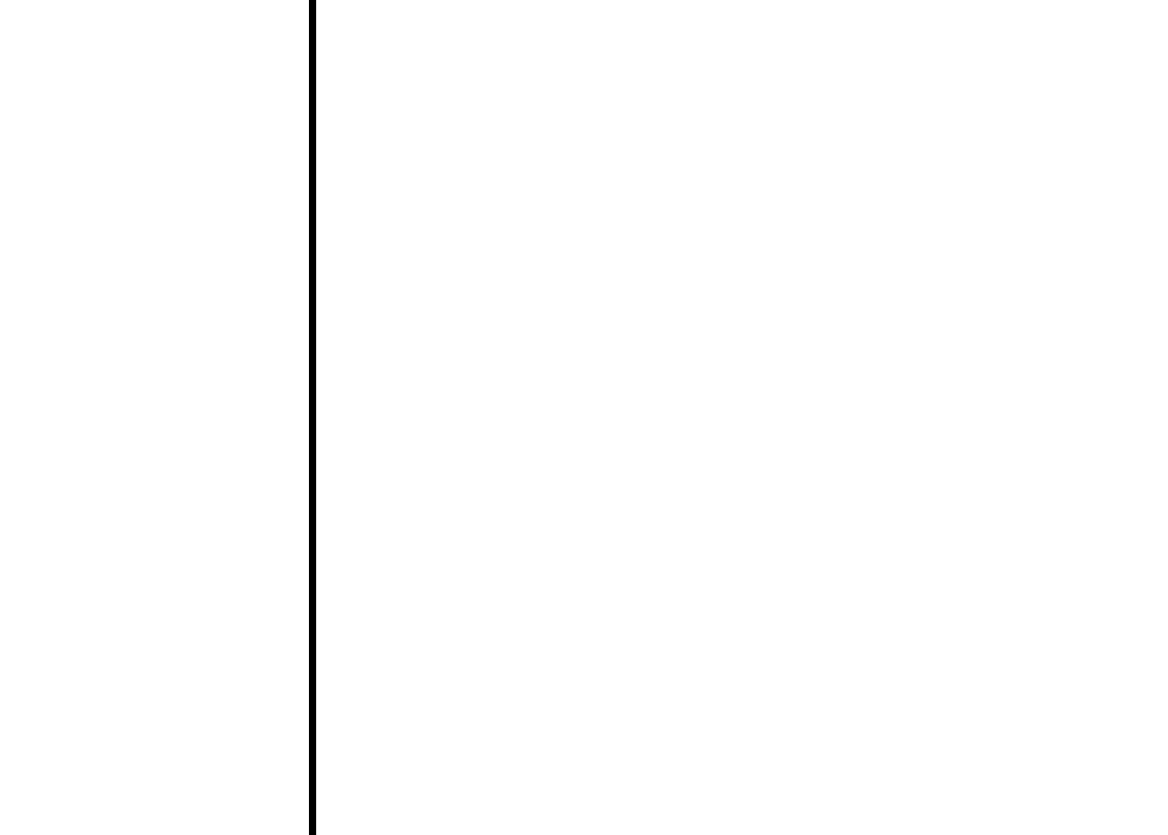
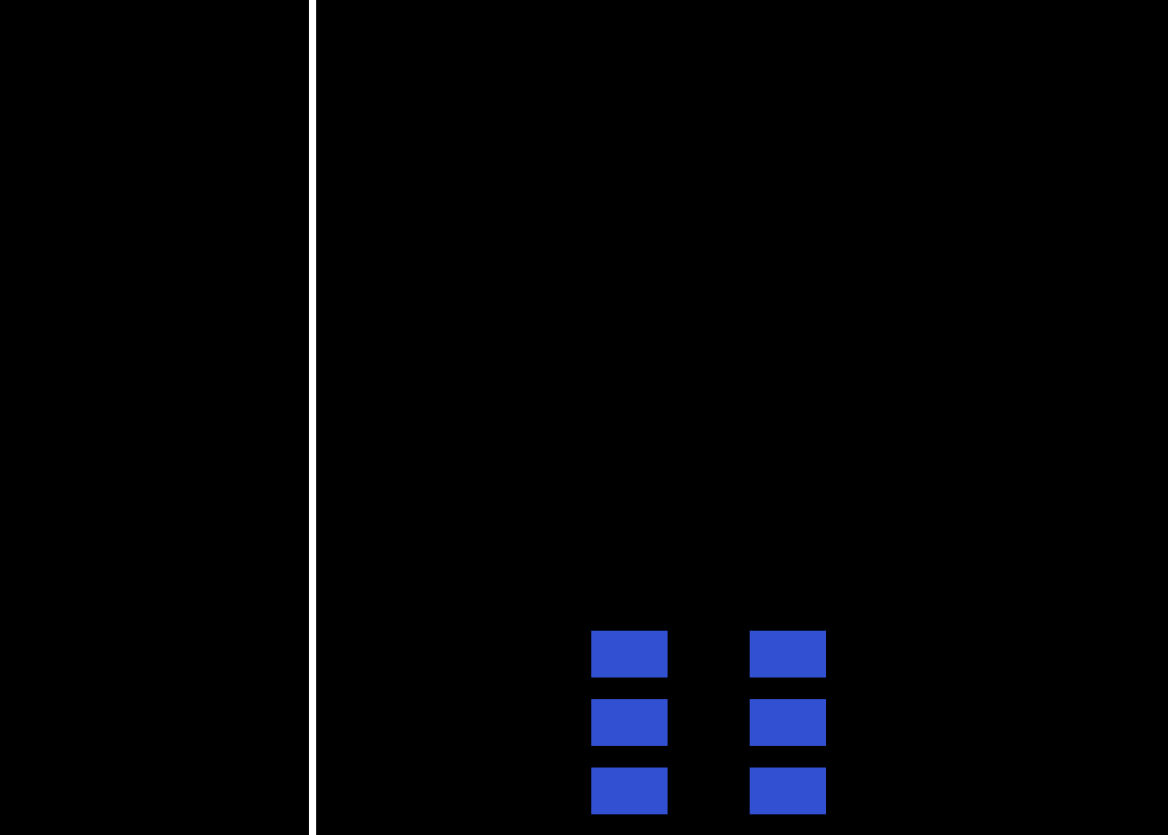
part: none -> (708, 722)

